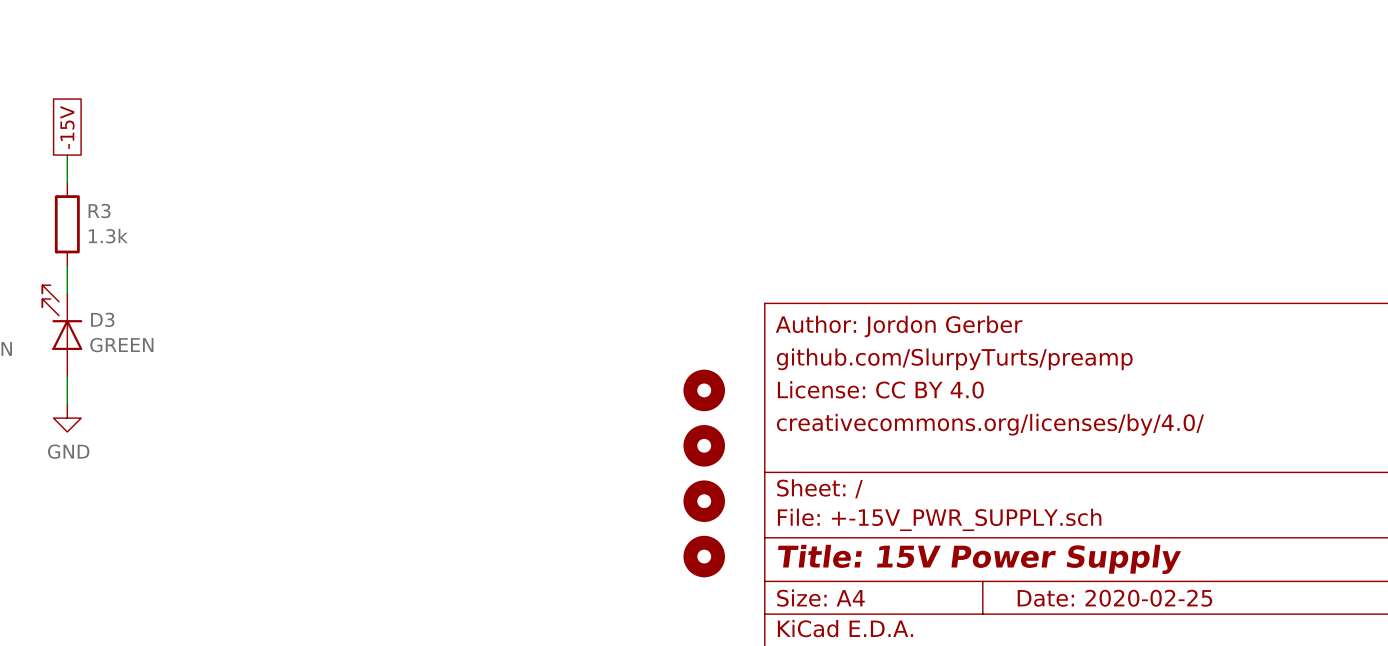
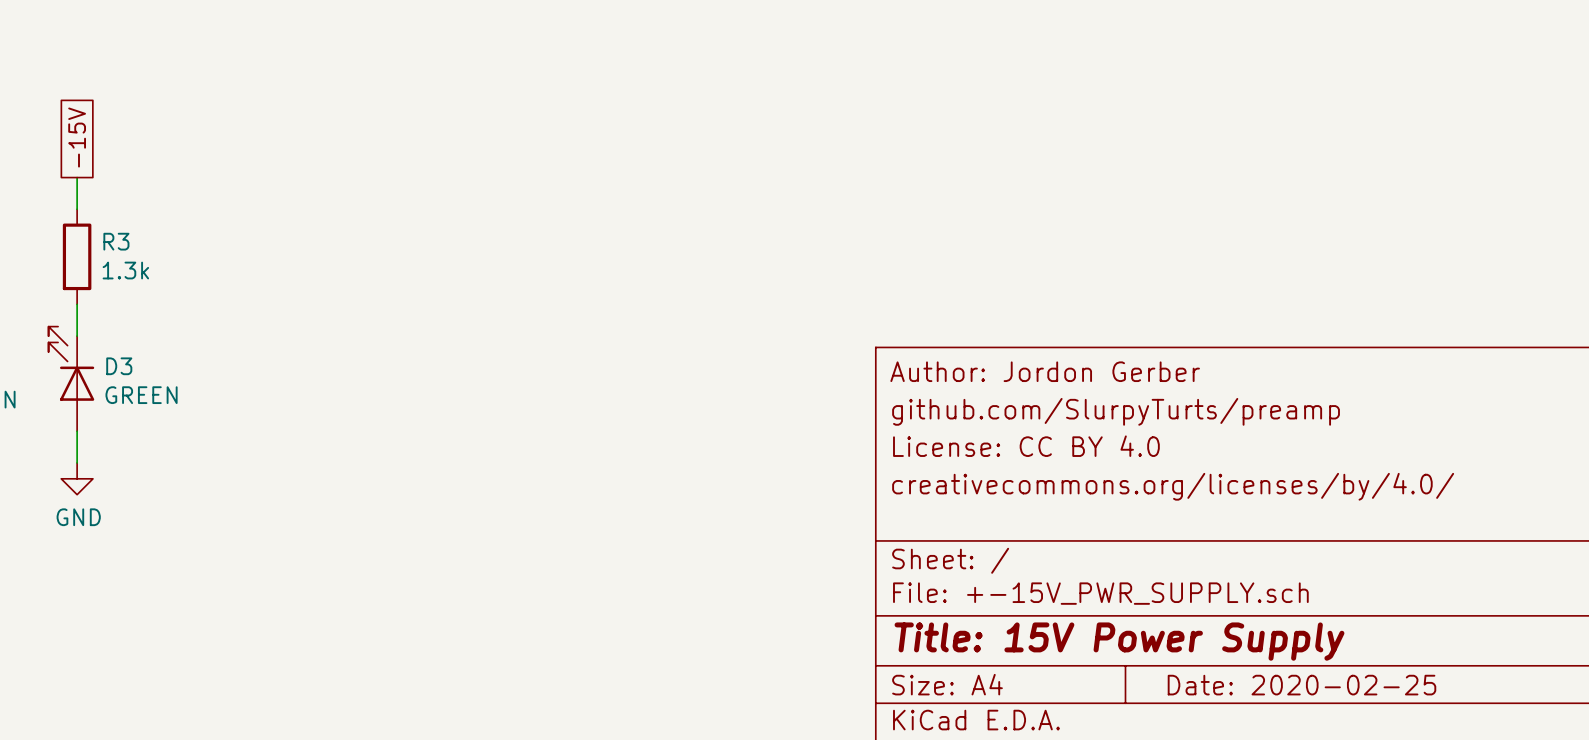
part: (704, 390) -> none
part: (704, 445) -> none
part: (704, 501) -> none
part: (704, 556) -> none

